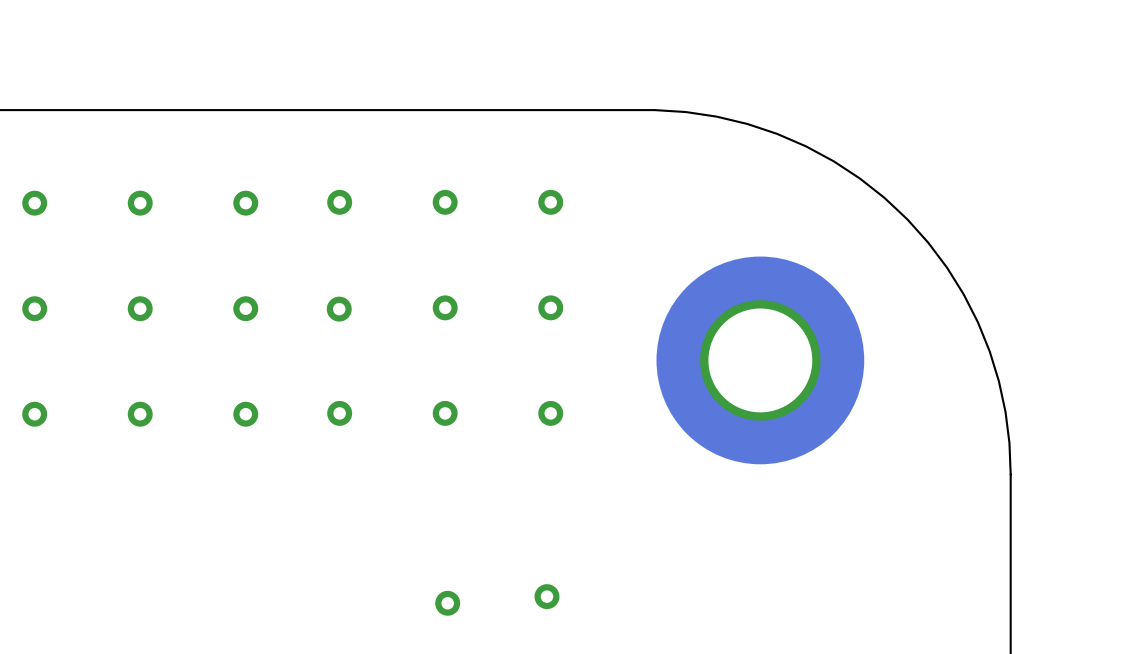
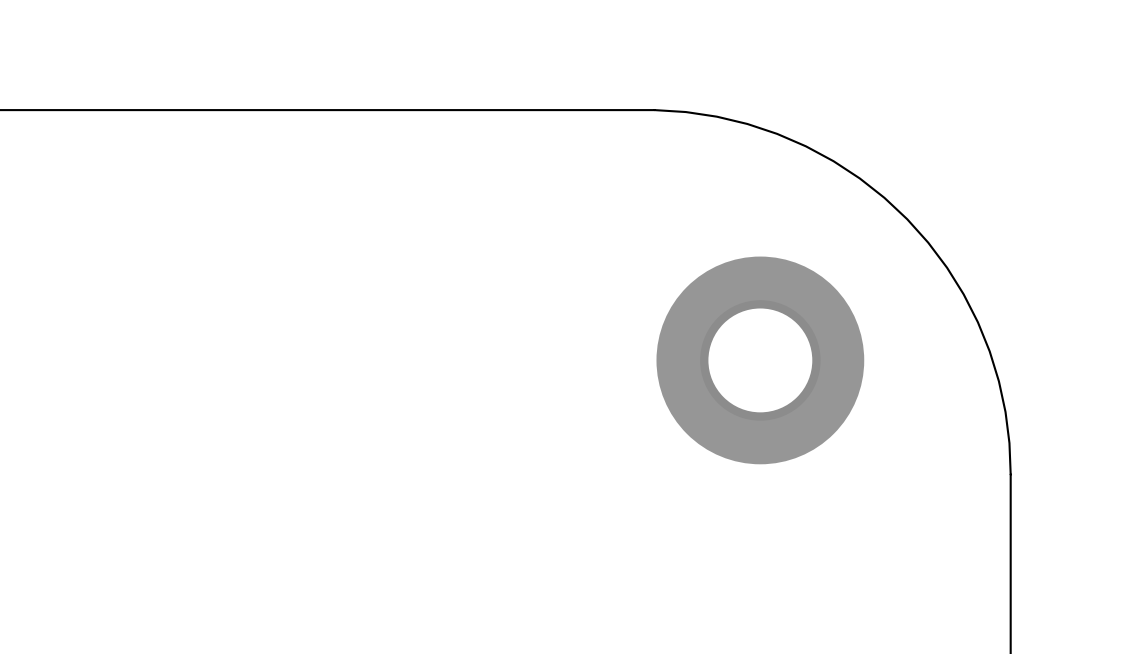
via: (339, 202) -> none
via: (445, 202) -> none
via: (550, 202) -> none
via: (34, 203) -> none
via: (140, 203) -> none
via: (245, 203) -> none
via: (445, 307) -> none
via: (550, 307) -> none
via: (34, 308) -> none
via: (140, 308) -> none
via: (245, 308) -> none
via: (339, 309) -> none
via: (339, 413) -> none
via: (445, 413) -> none
via: (550, 413) -> none
via: (34, 414) -> none
via: (140, 414) -> none
via: (245, 414) -> none
via: (547, 596) -> none
via: (447, 603) -> none

